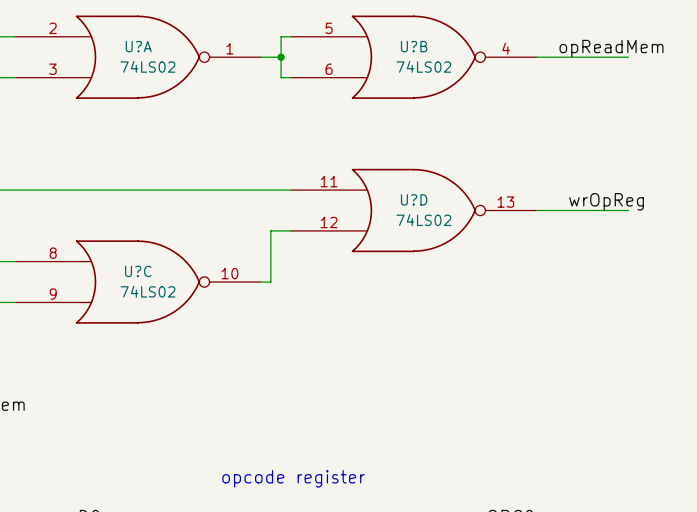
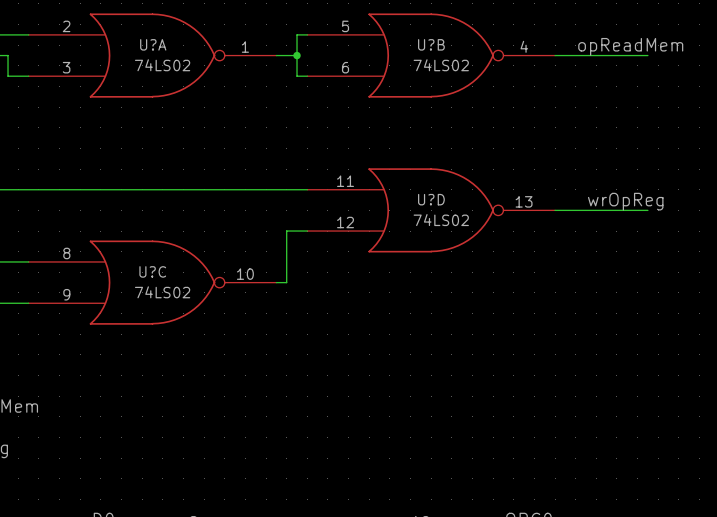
text: opcode register (293, 478) -> none

